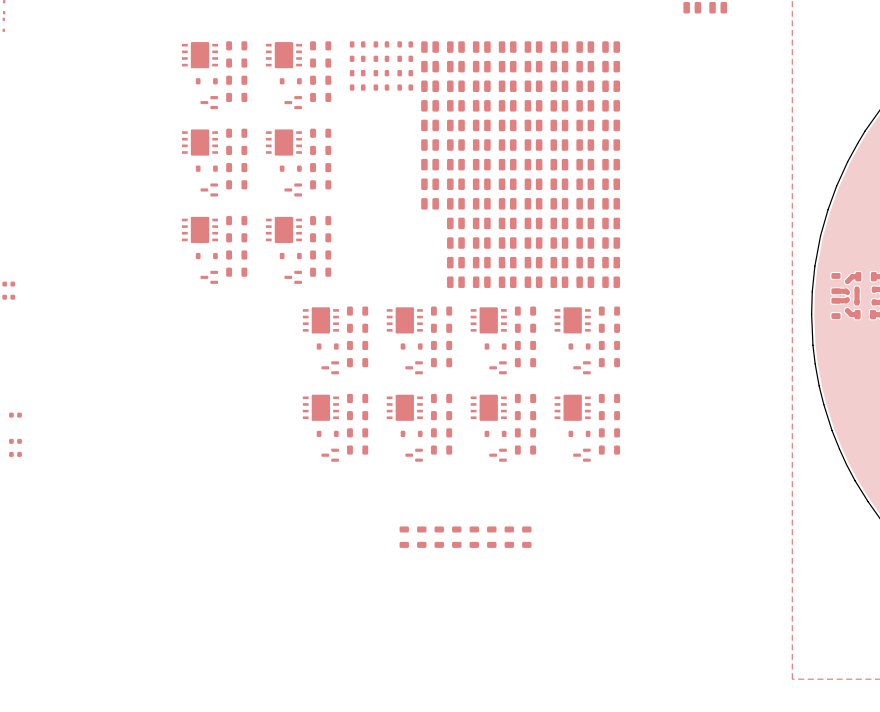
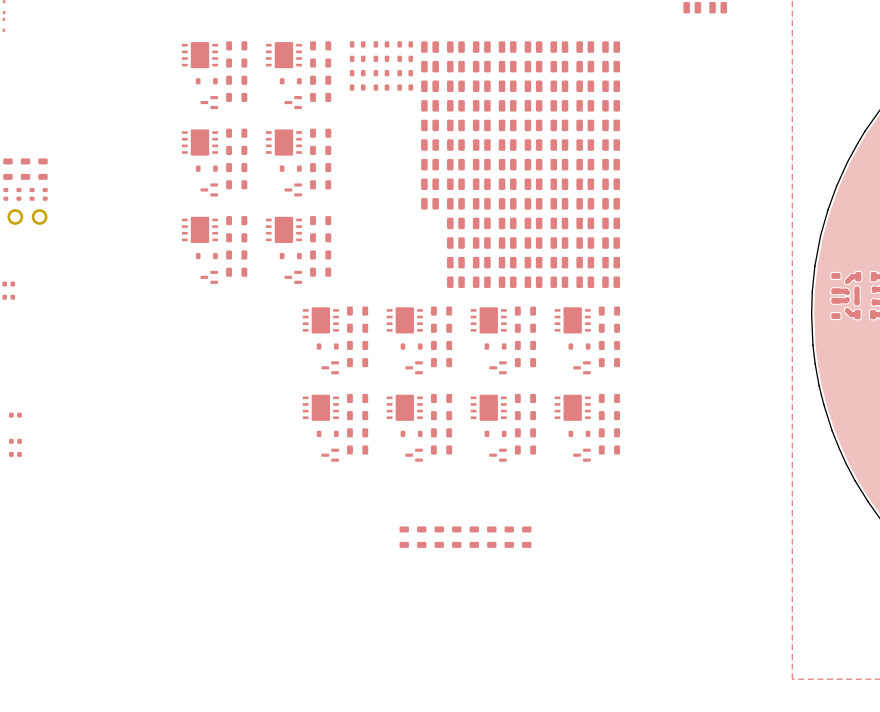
part: none -> (7, 169)
part: none -> (25, 169)
part: none -> (43, 169)
part: none -> (5, 194)
part: none -> (18, 194)
part: none -> (32, 194)
part: none -> (45, 194)
part: none -> (15, 217)
part: none -> (39, 217)

